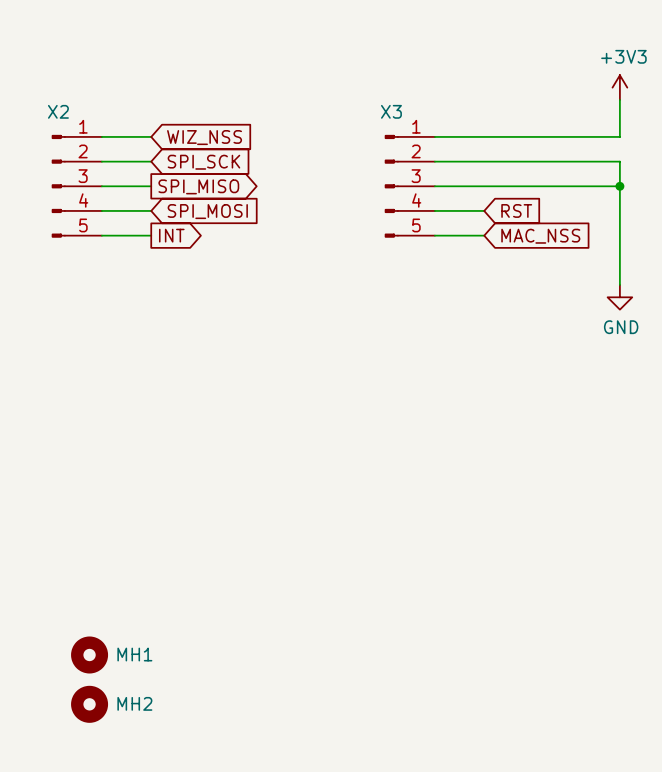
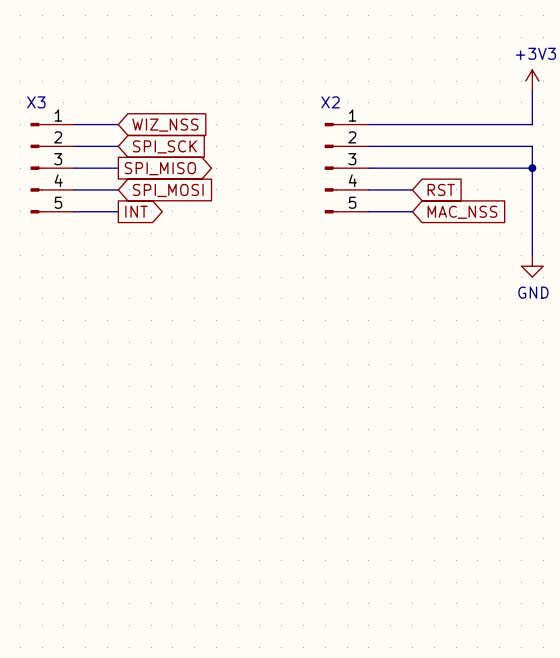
X2 name: X2 (58, 111) -> X3 (36, 102)
X3 name: X3 (391, 111) -> X2 (330, 102)
MH1: (89, 654) -> none
MH2: (89, 704) -> none

